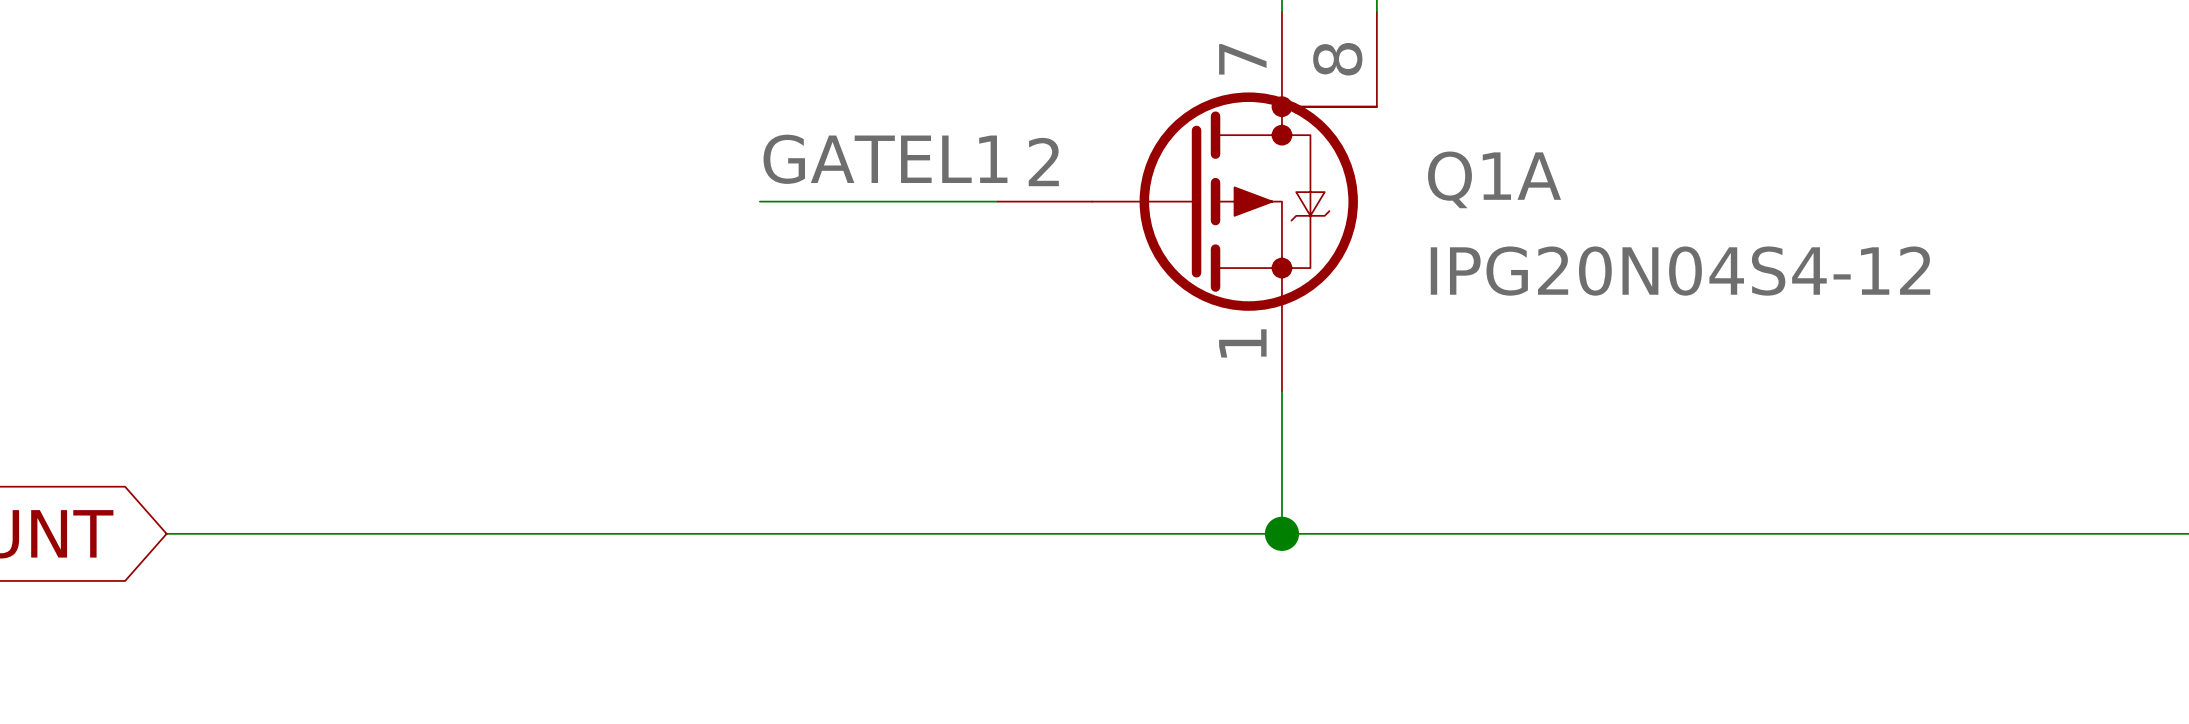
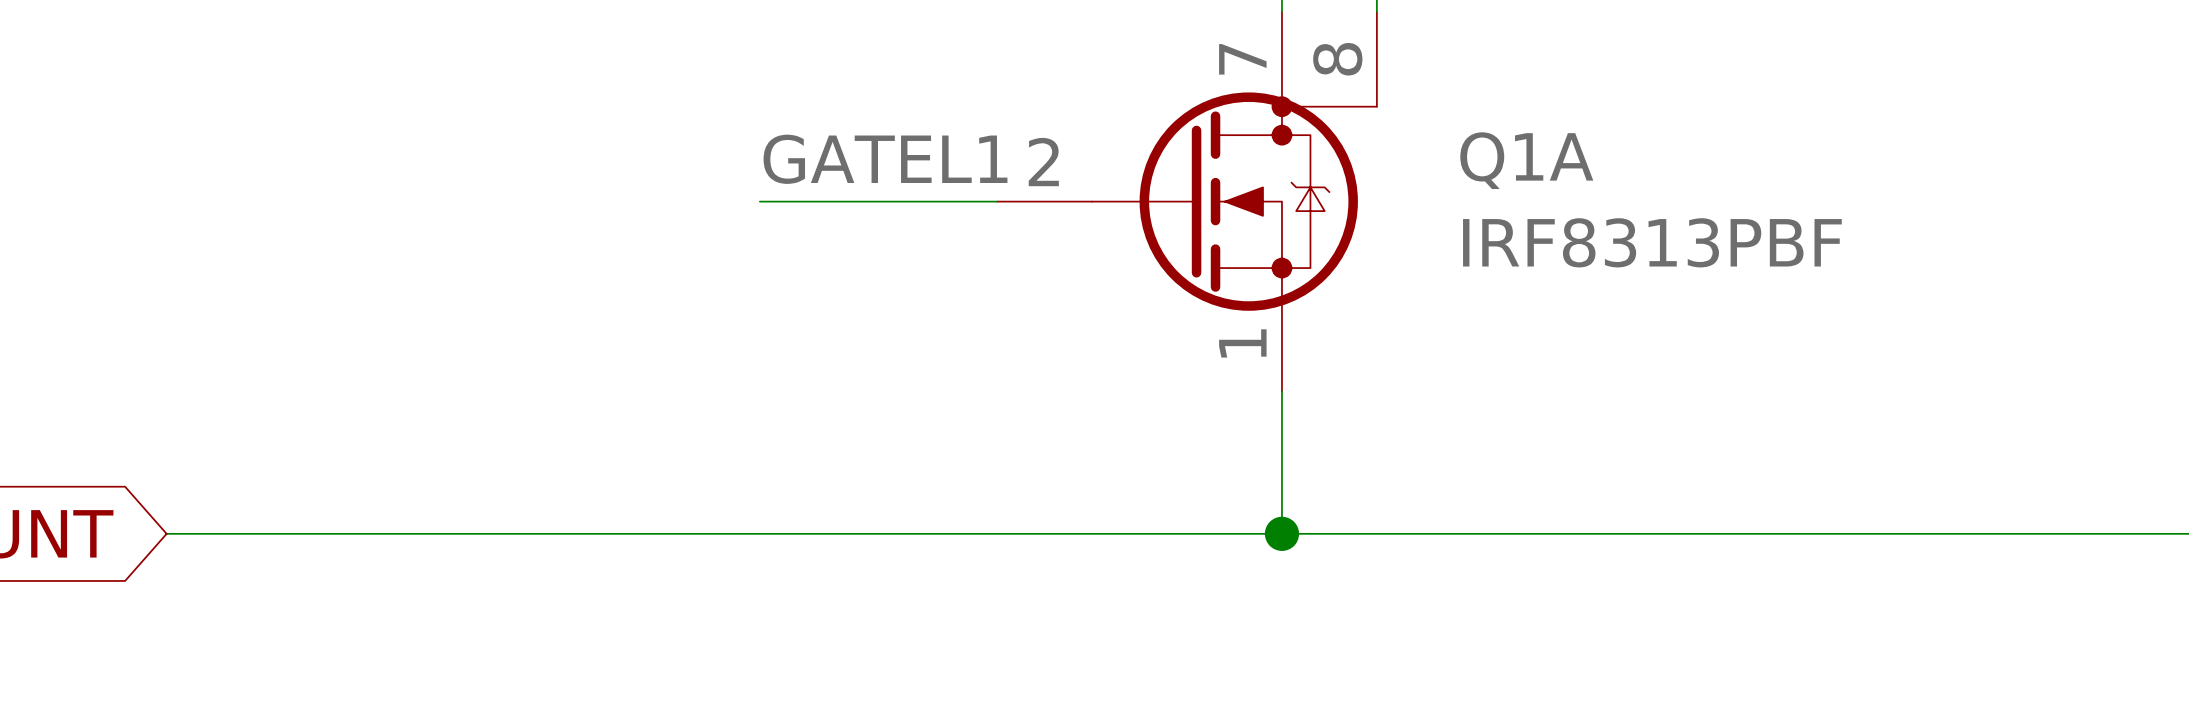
Q1A symbol: [997, 11, 1377, 392] -> [997, 11, 1377, 392]
Q1A name position: Q1A (1494, 179) -> Q1A (1526, 160)
Q1A value: IPG20N04S4-12 (1680, 271) -> IRF8313PBF (1652, 242)

